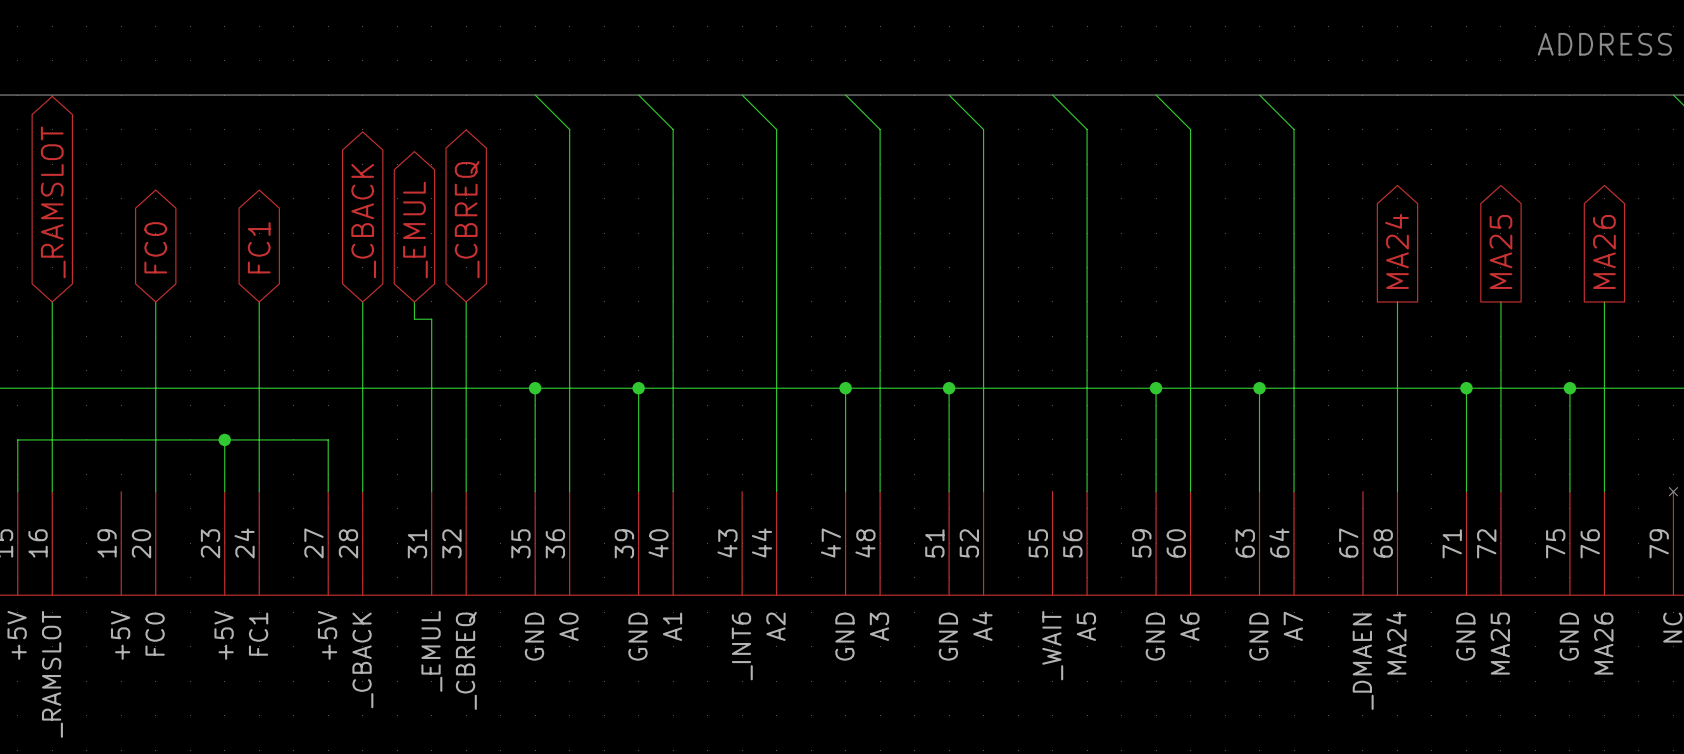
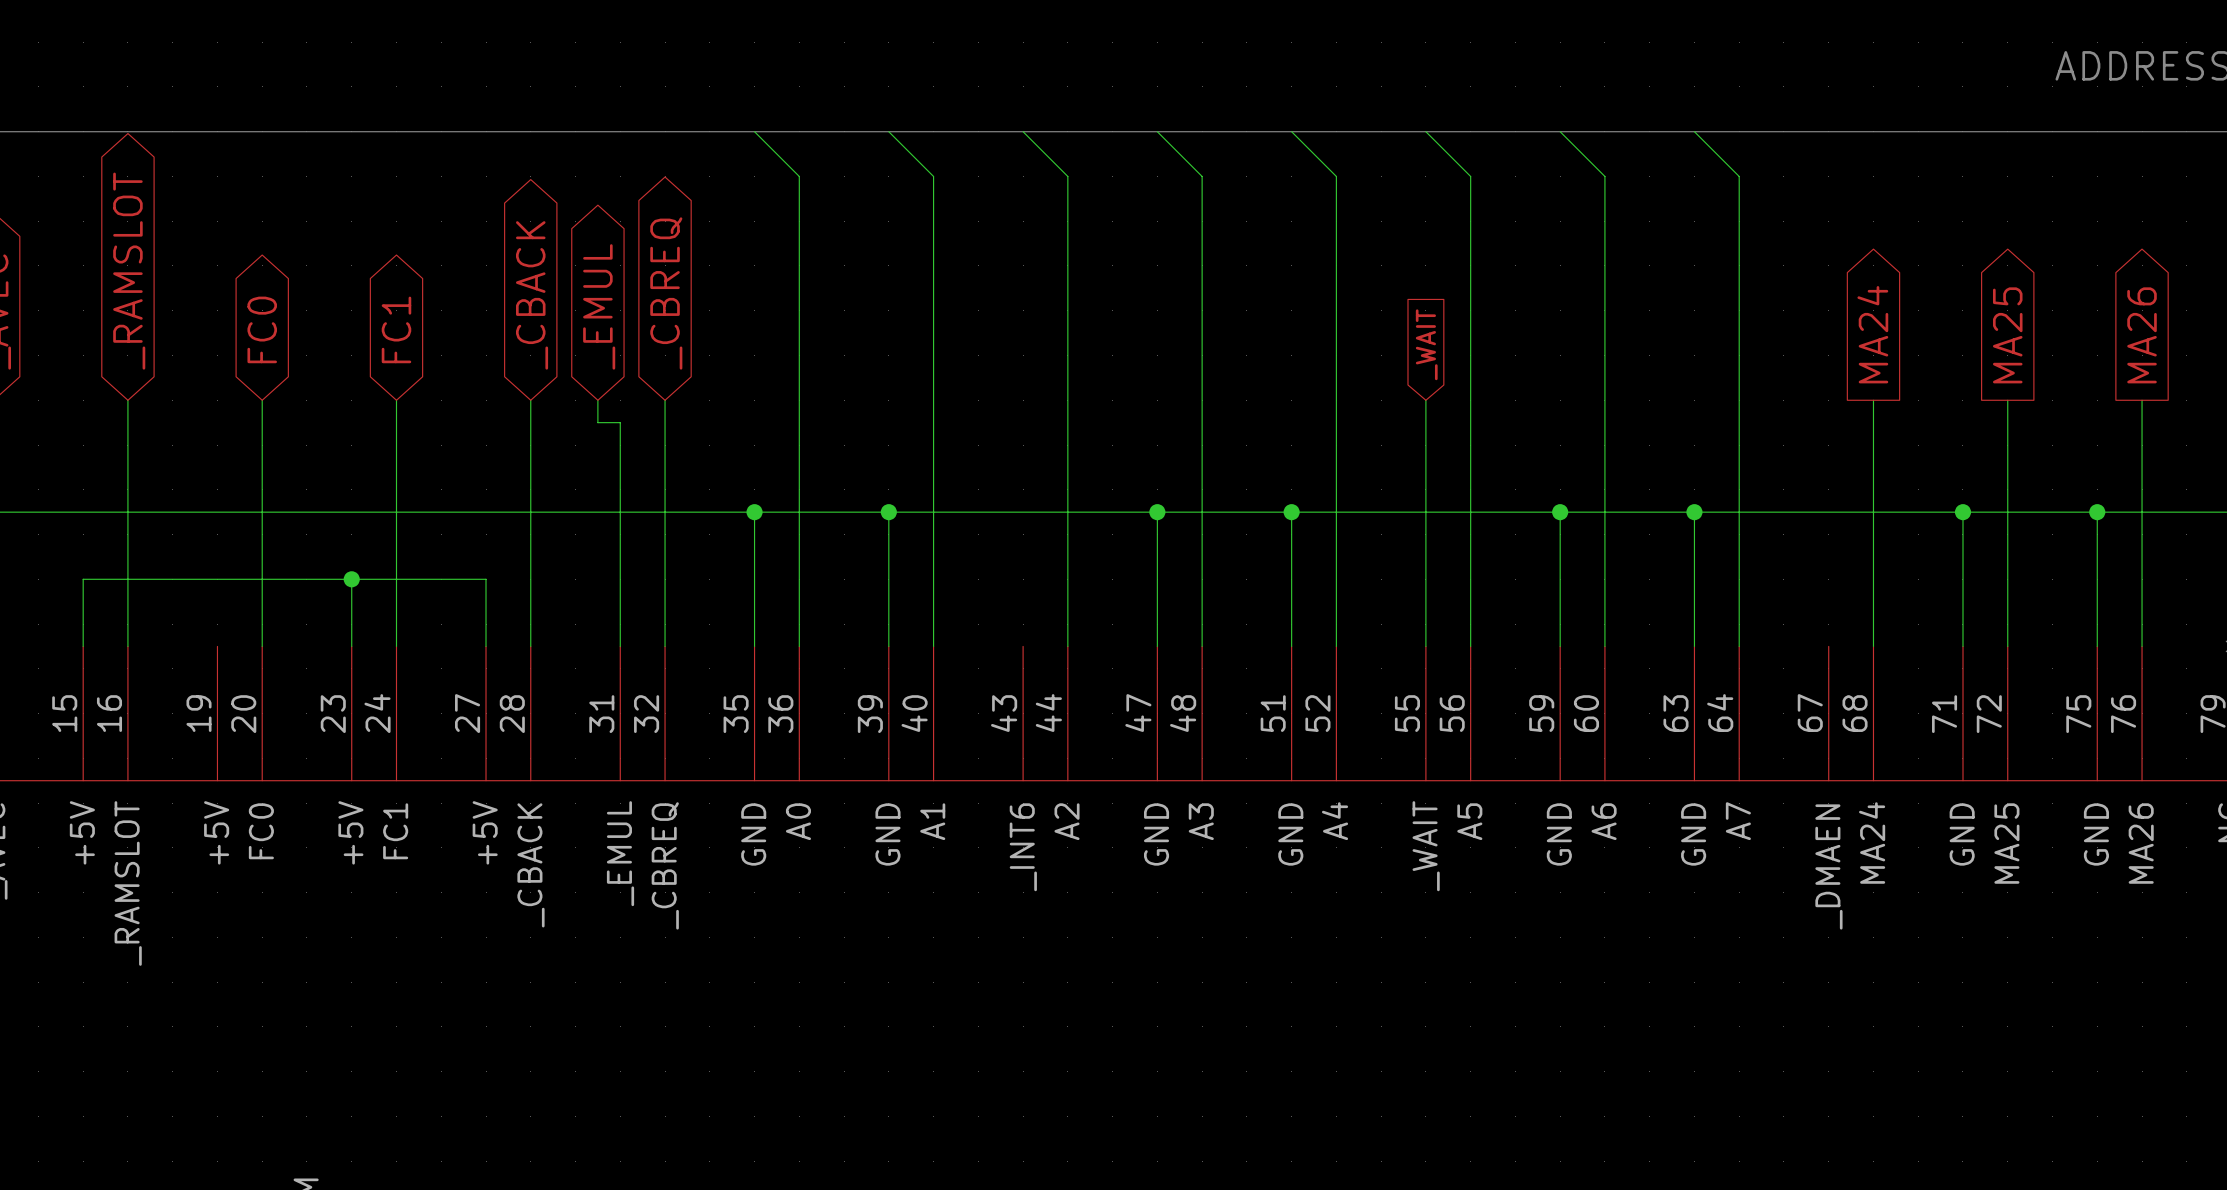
global label: none -> _WAIT (1426, 344)
wire: none -> (1425, 400) (1425, 646)

